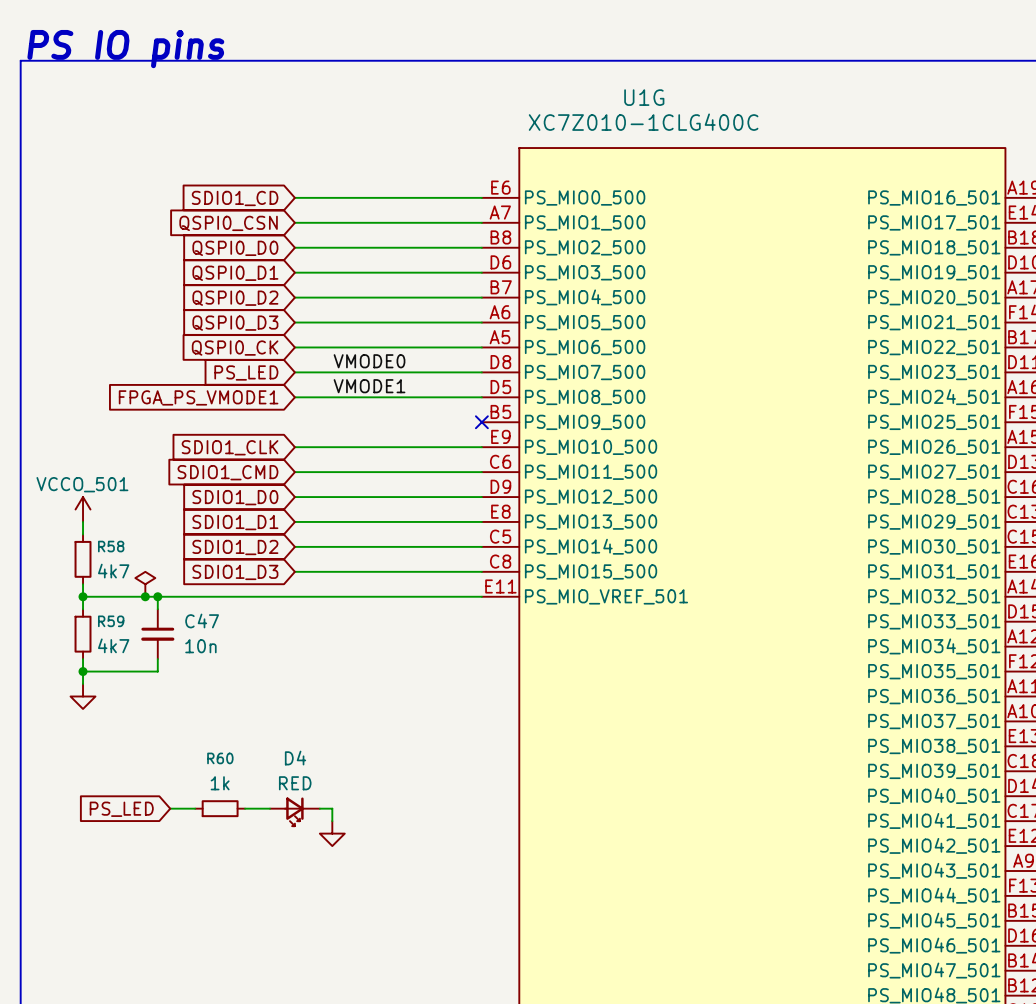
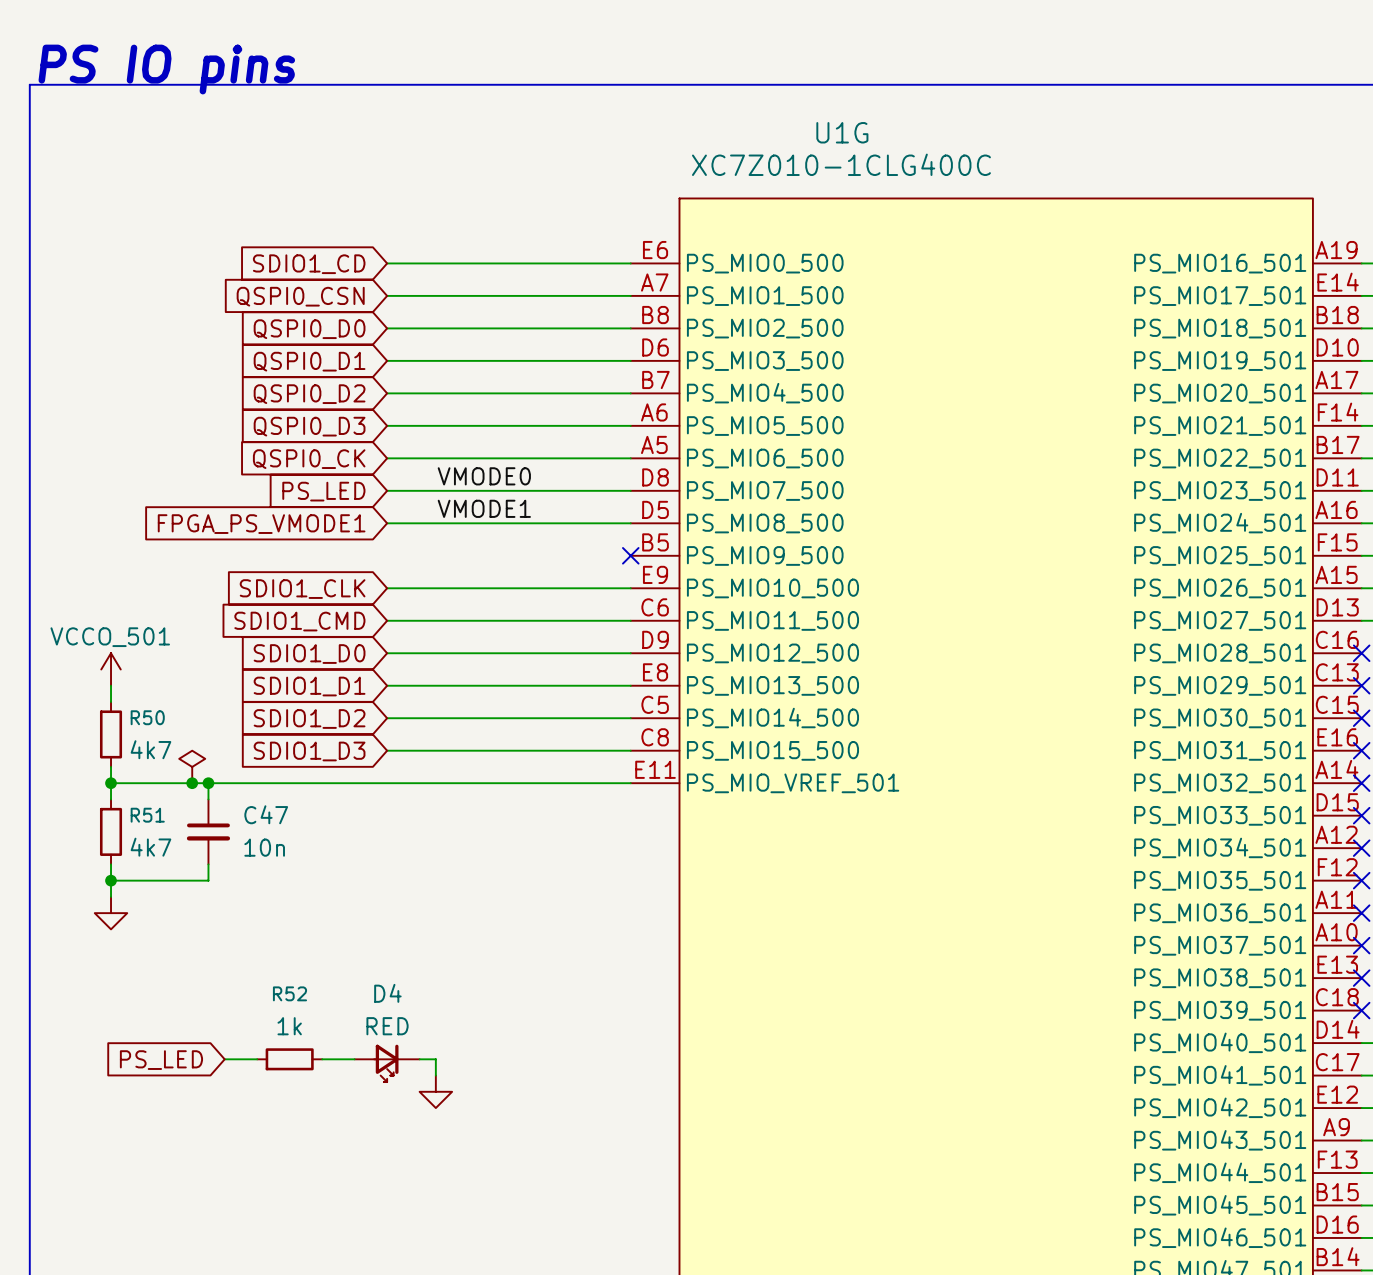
R58 name: R58 (111, 546) -> R50 (147, 717)
R59 name: R59 (111, 621) -> R51 (147, 815)
R60 name: R60 (220, 758) -> R52 (289, 993)

